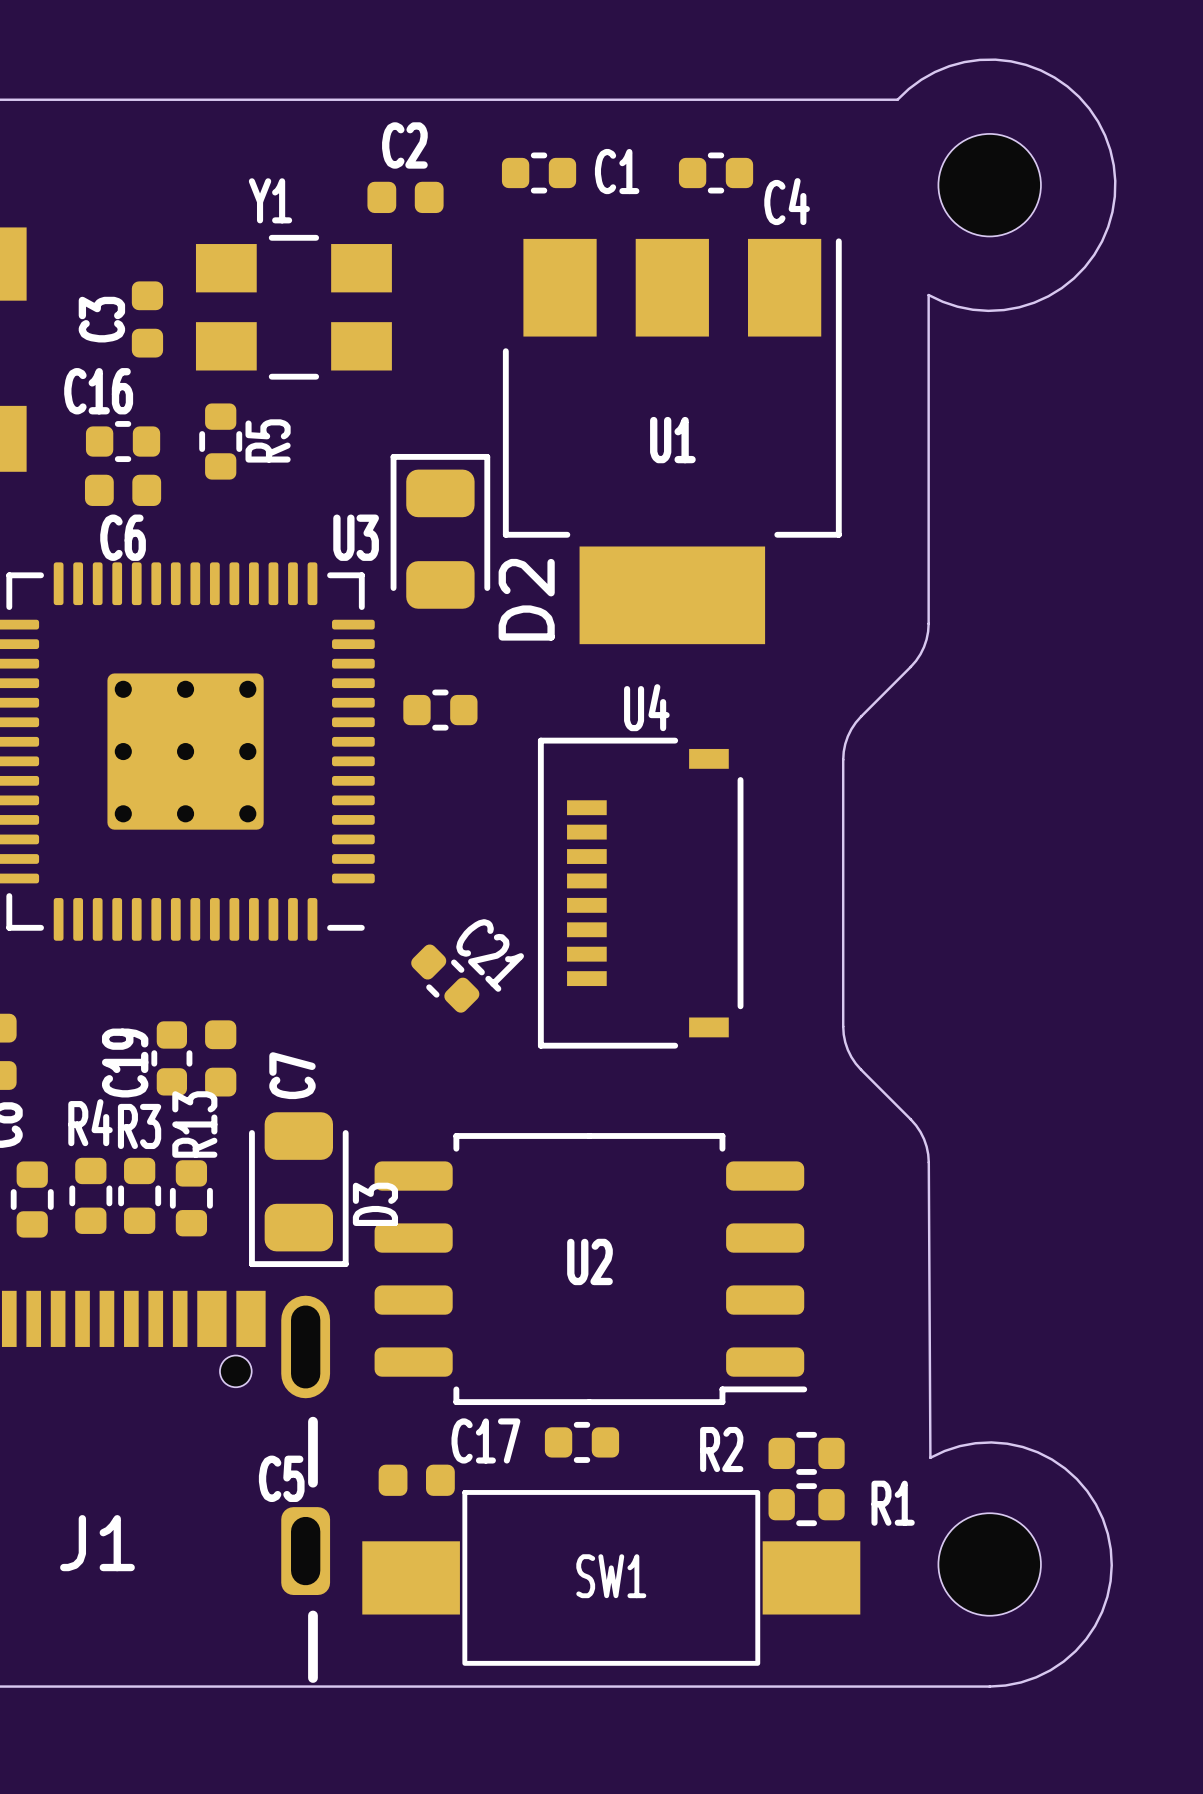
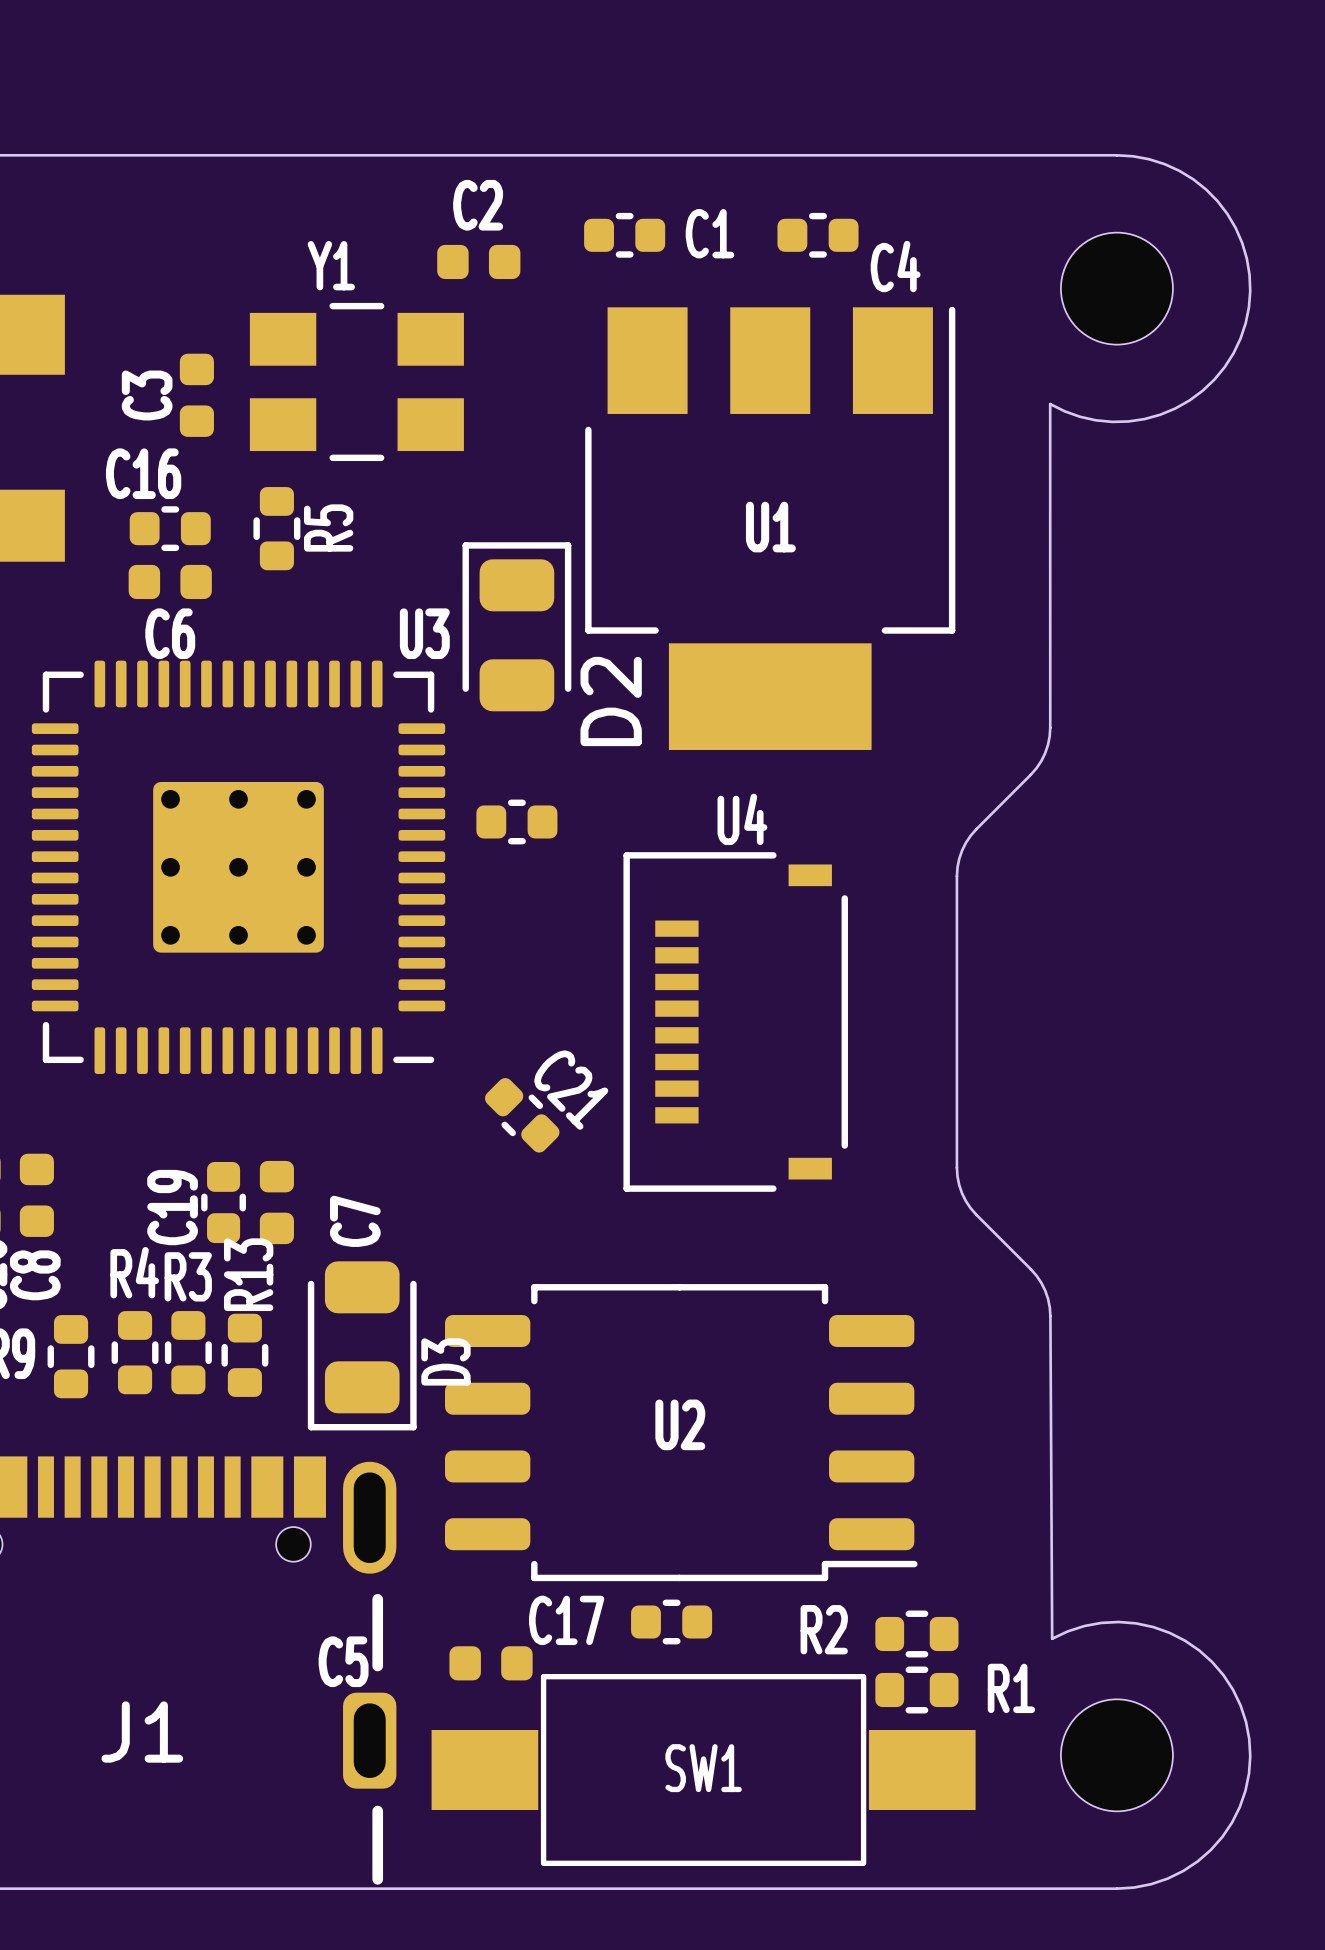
board edge: (897, 99) (908, 88) (934, 72) (964, 62) (995, 59) (1026, 64) (1054, 77) (1079, 96) (1089, 108) (1105, 135) (1110, 150) (1115, 180) (1112, 211) (1102, 241) (1094, 254) (1073, 278) (1048, 296) (1019, 307) (988, 310) (957, 306) (928, 295) (928, 623) -> (1016, 155) (1133, 156) (1149, 159) (1179, 170) (1206, 189) (1227, 214) (1242, 243) (1249, 274) (1248, 307) (1245, 323) (1233, 353) (1214, 379) (1189, 400) (1160, 414) (1128, 421) (1112, 421) (1080, 416) (1050, 404) (1050, 727)
part position: (989, 185) -> (1116, 288)

